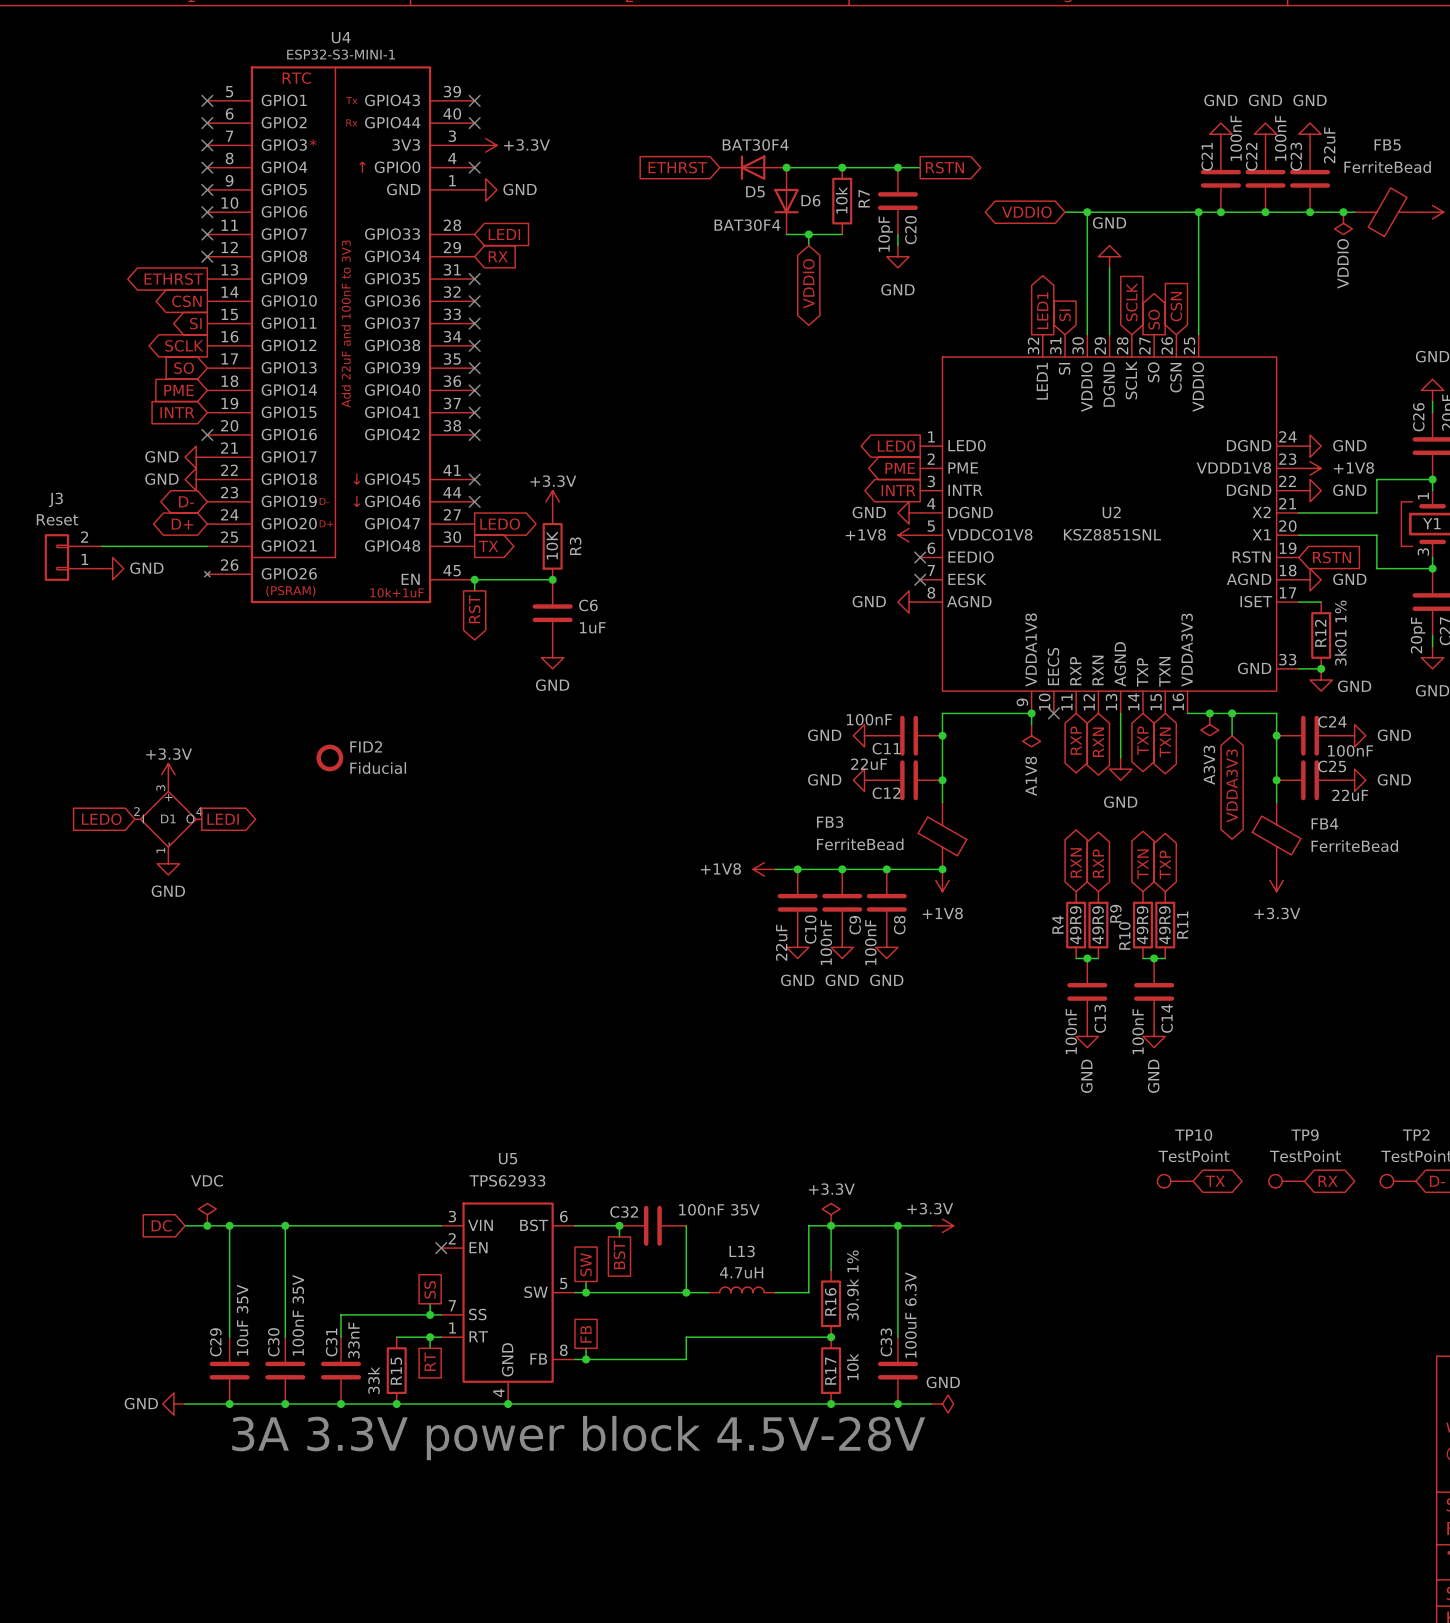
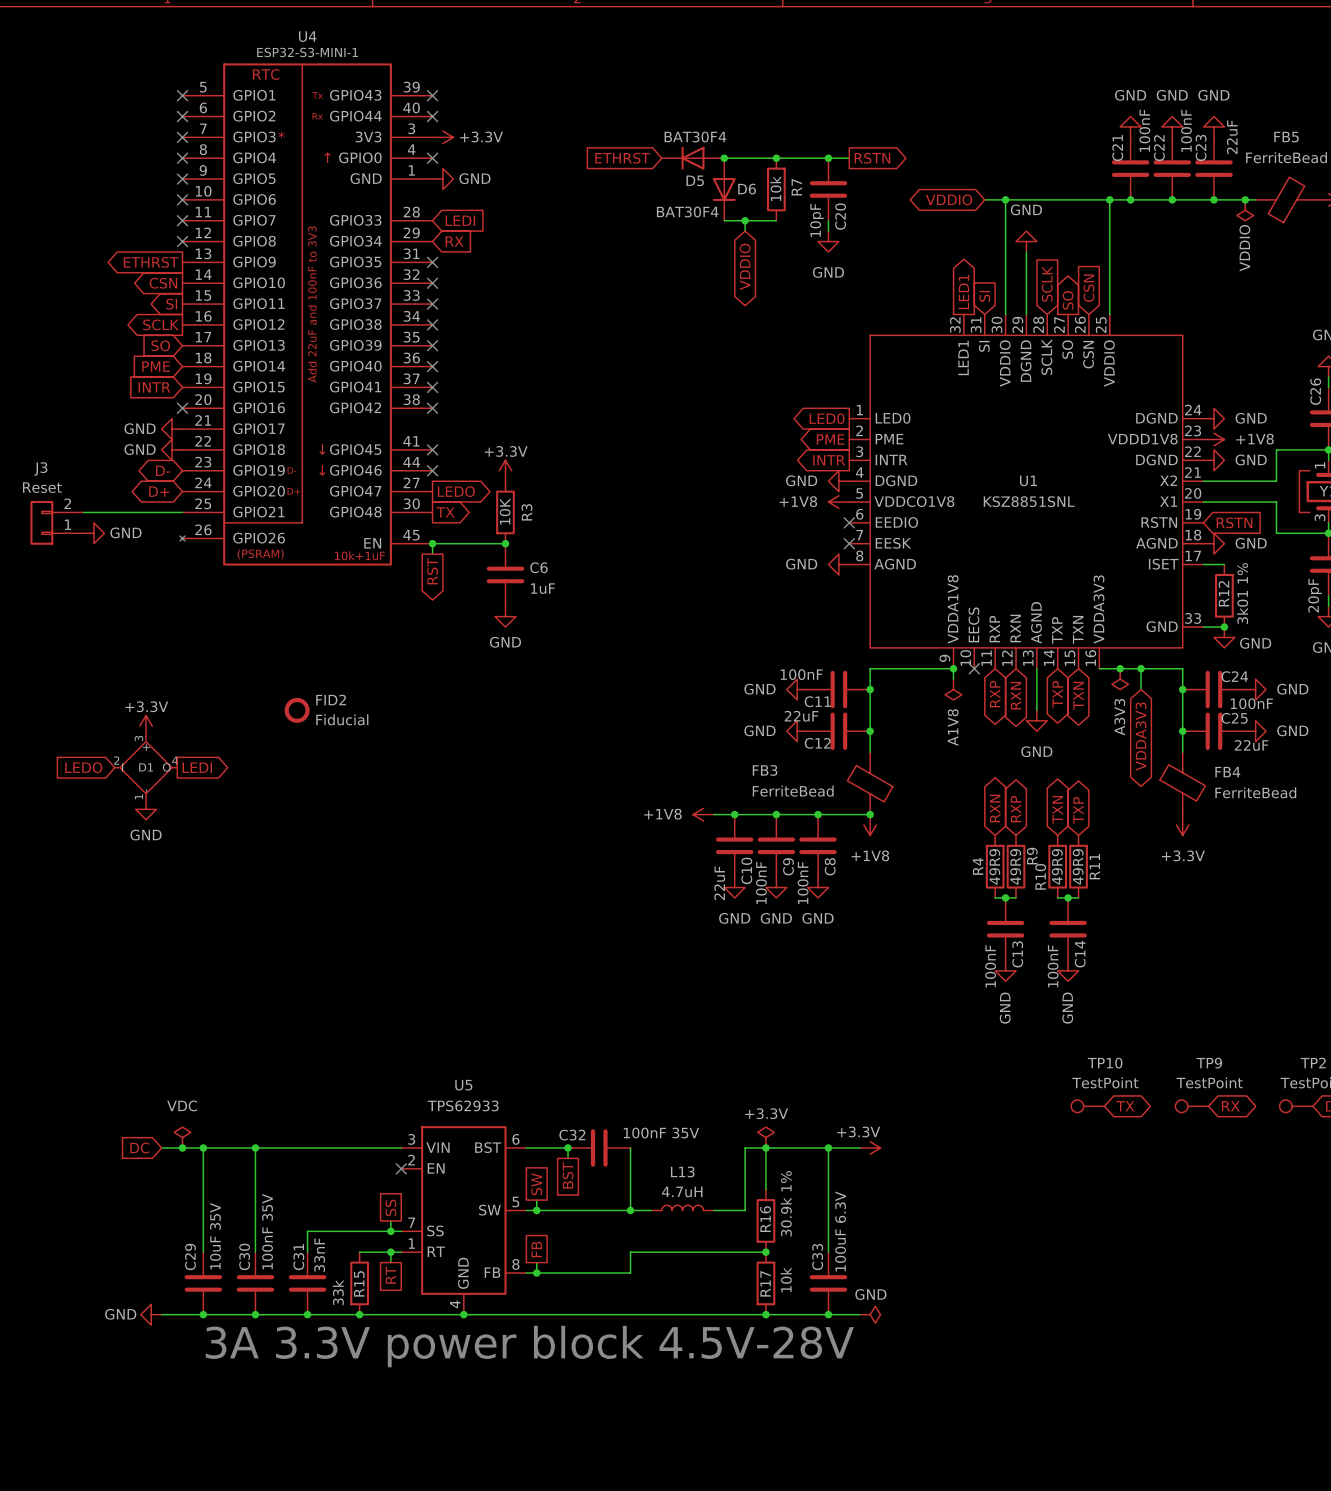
U2 name: U2 (1111, 512) -> U1 (1028, 480)

